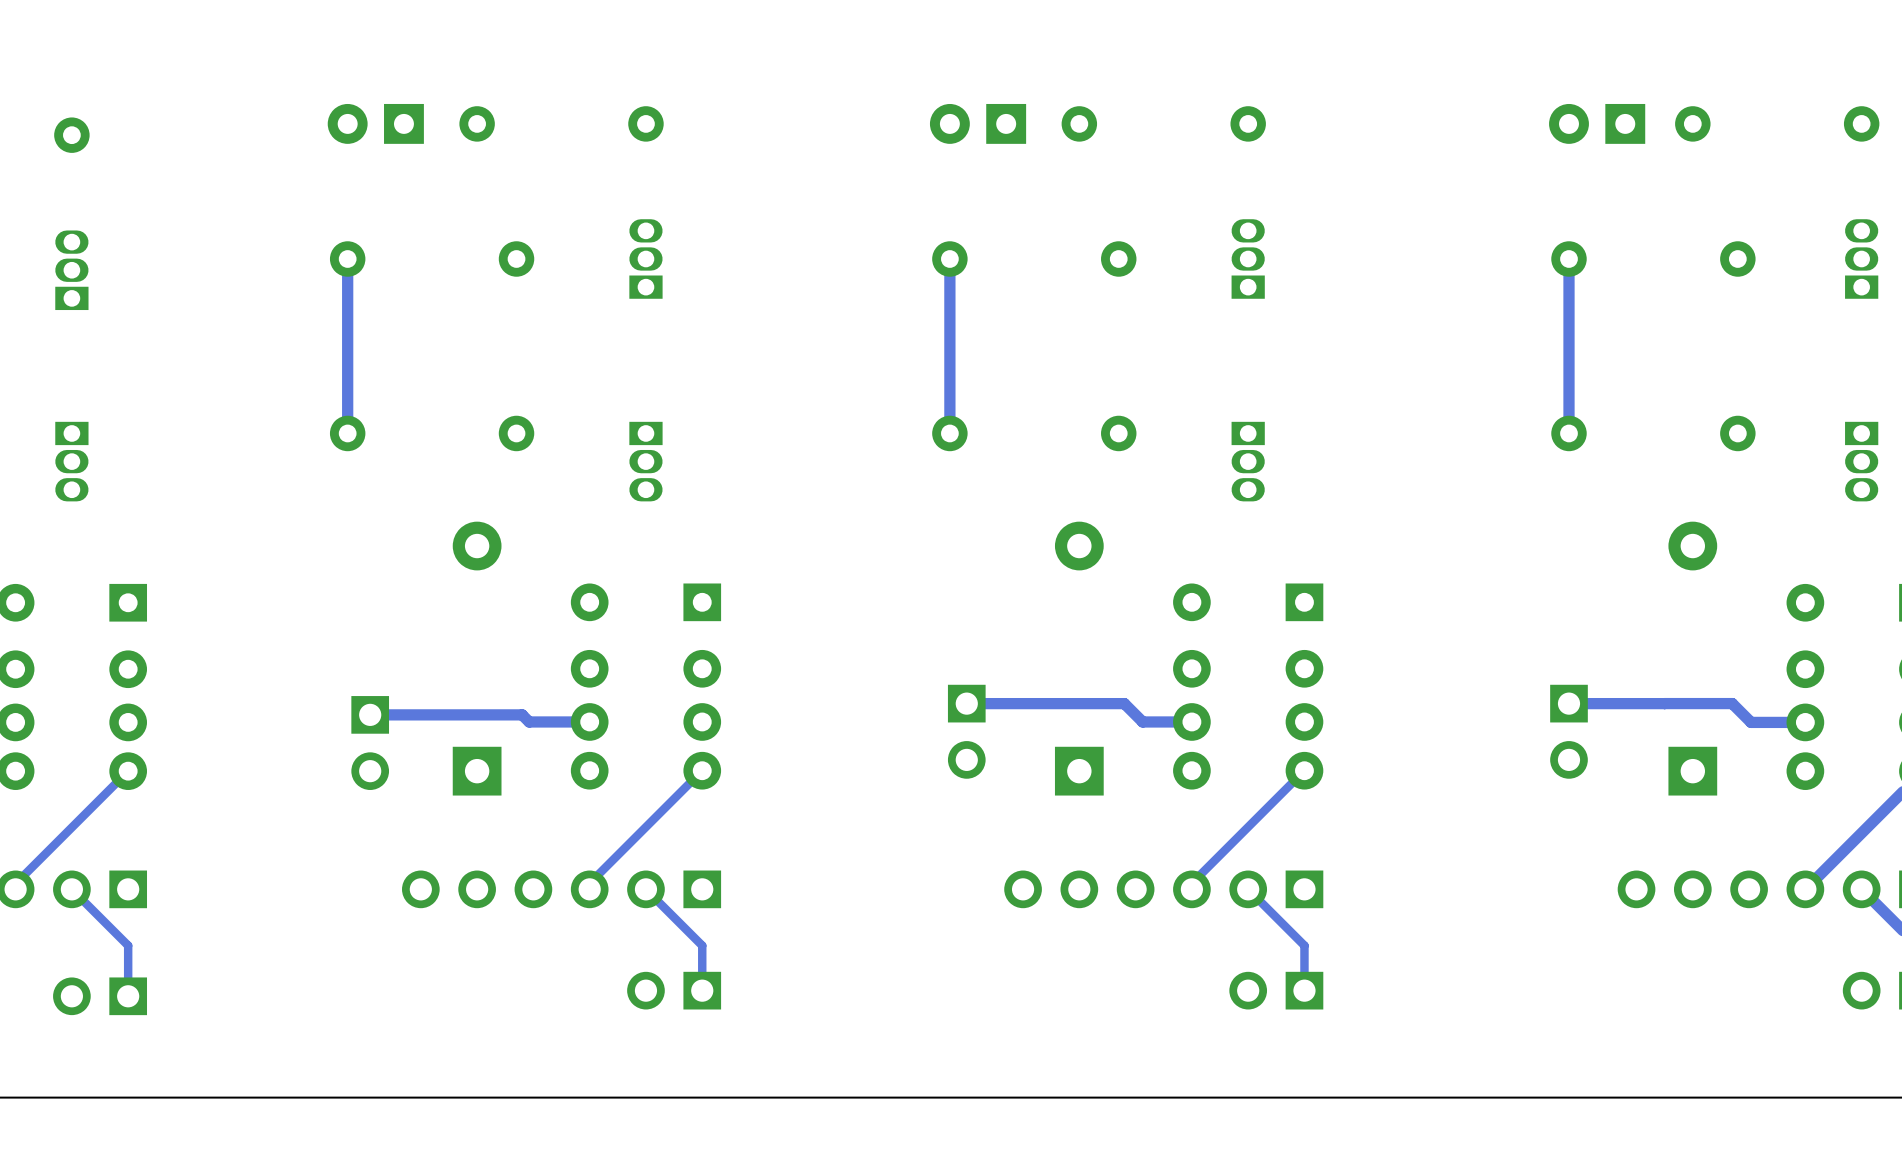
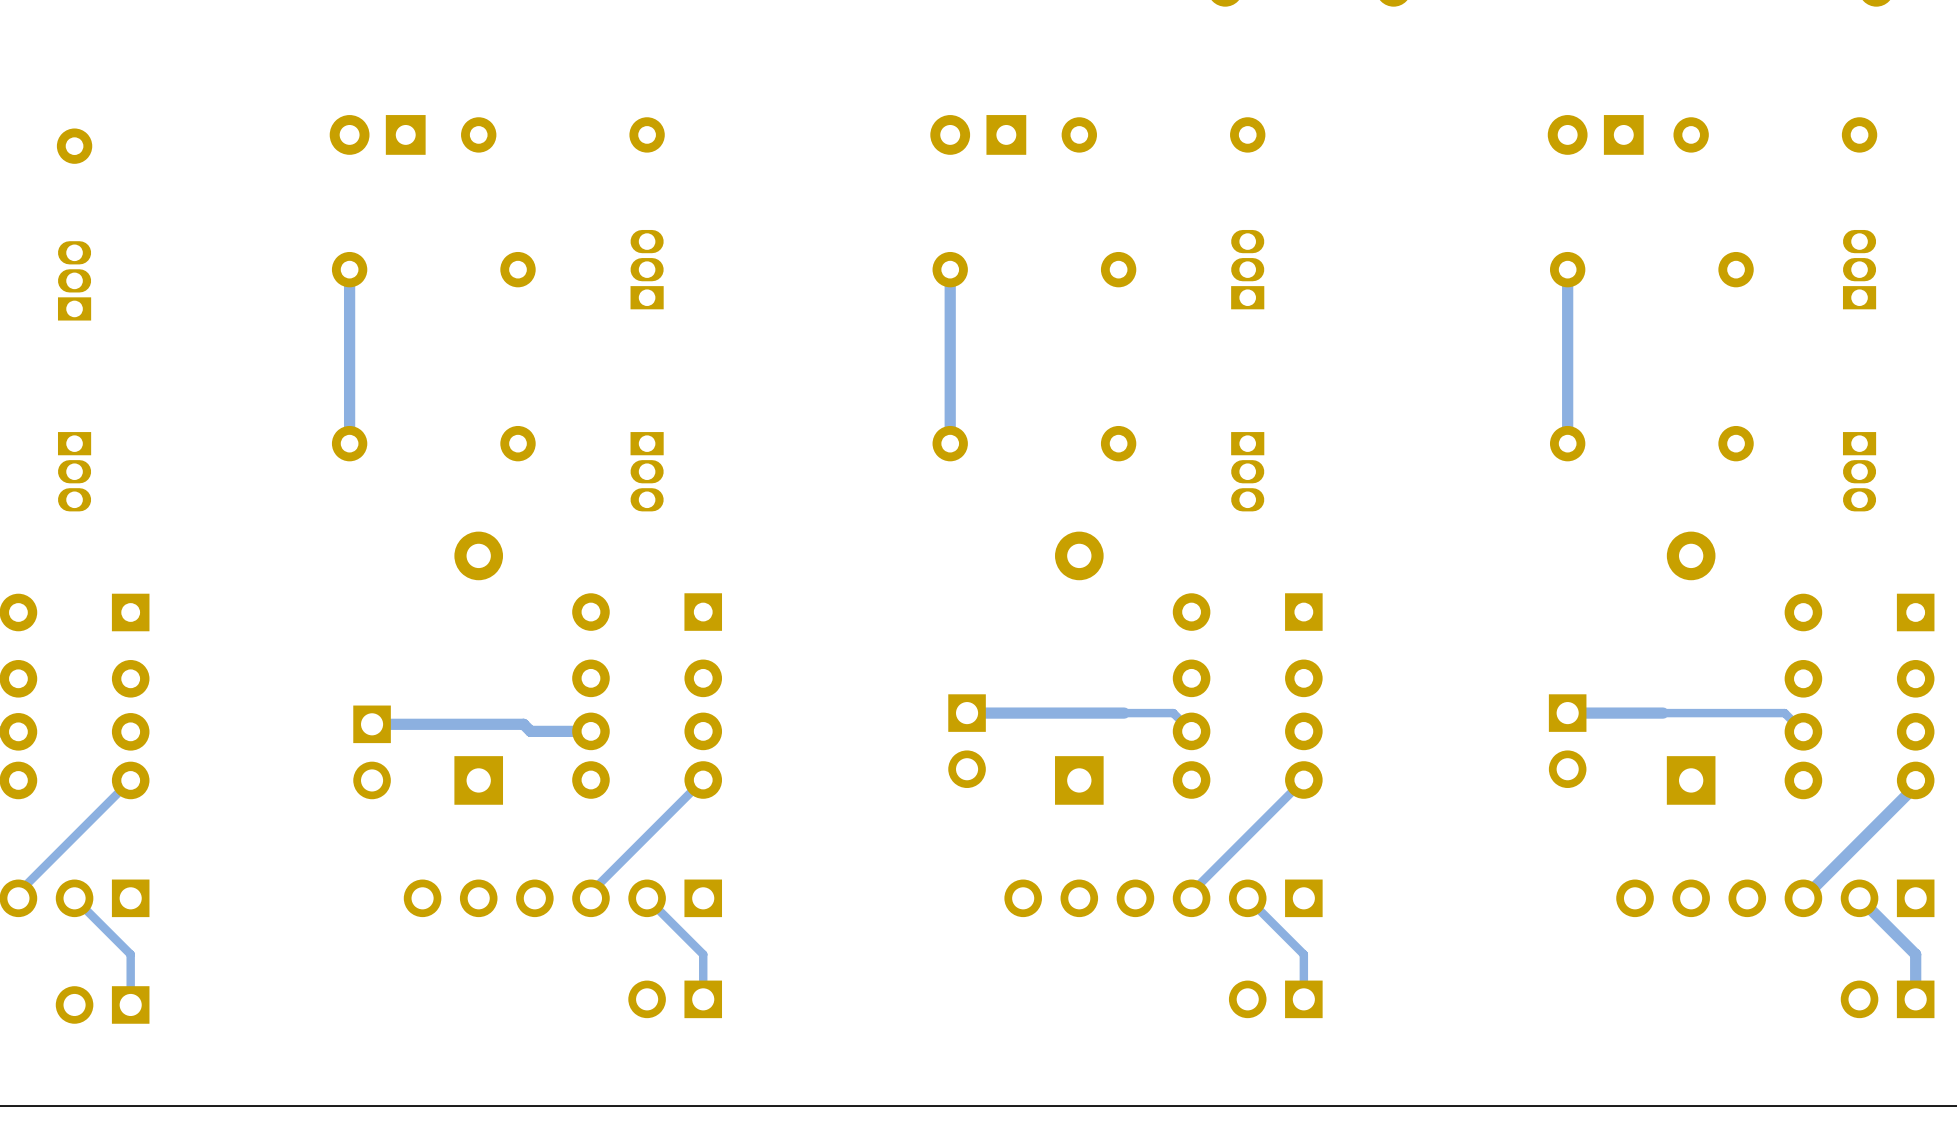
track: (1124, 703) (1142, 721) (1191, 721) -> (1124, 713) (1173, 713) (1191, 731)
track: (1664, 703) (1732, 703) (1751, 722) (1805, 722) -> (1663, 713) (1784, 713) (1803, 731)

